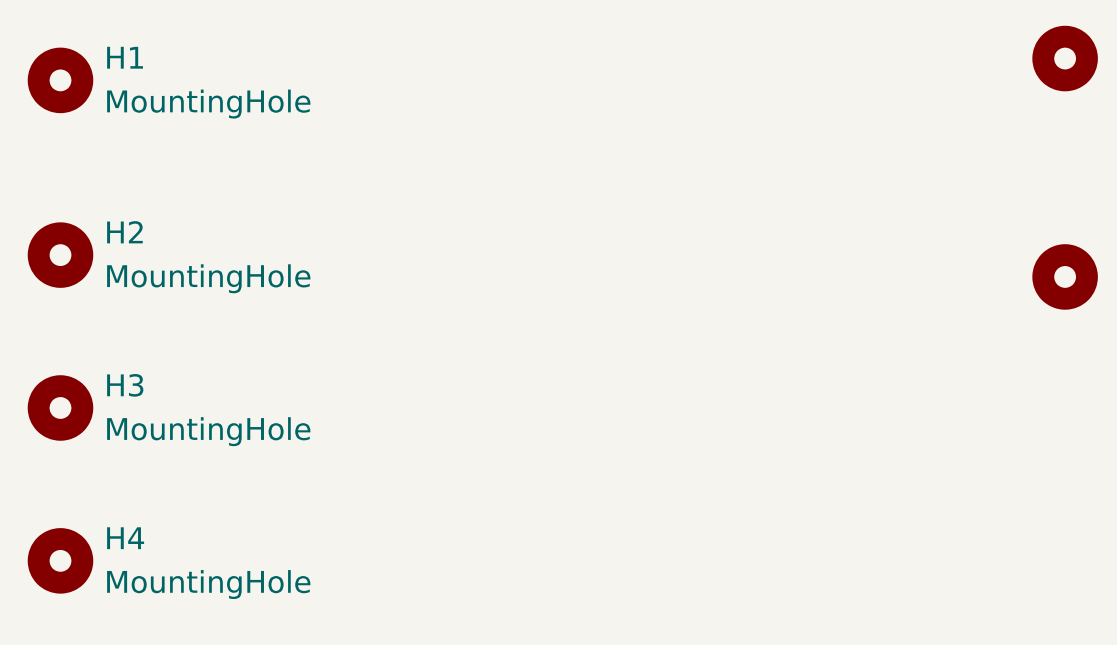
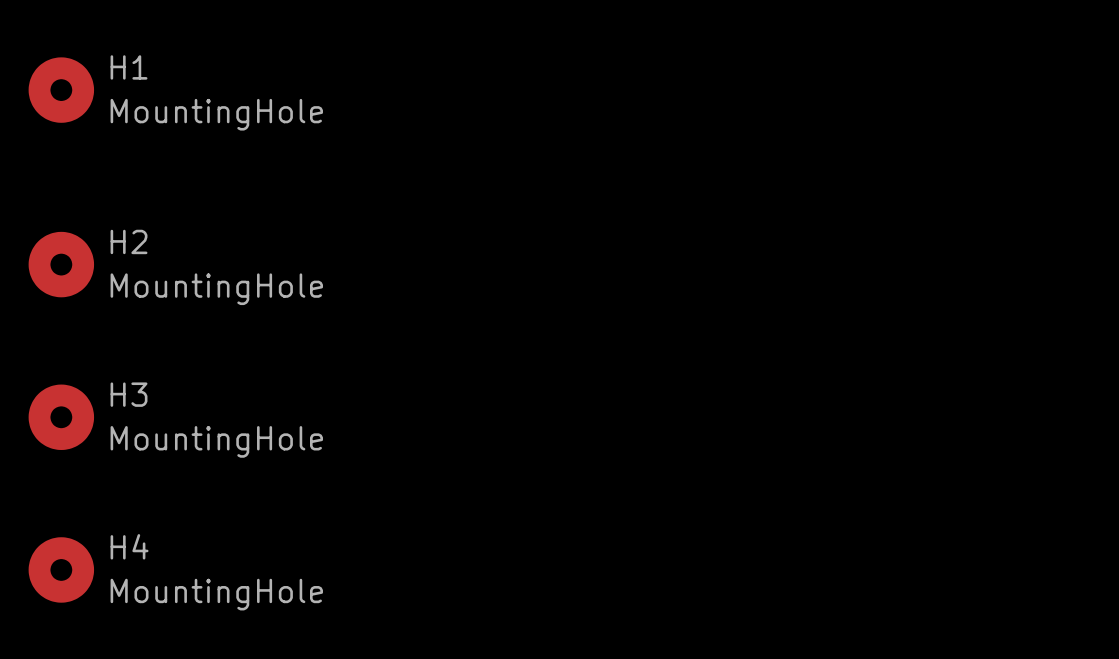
part: (1065, 58) -> none
part: (1065, 276) -> none

